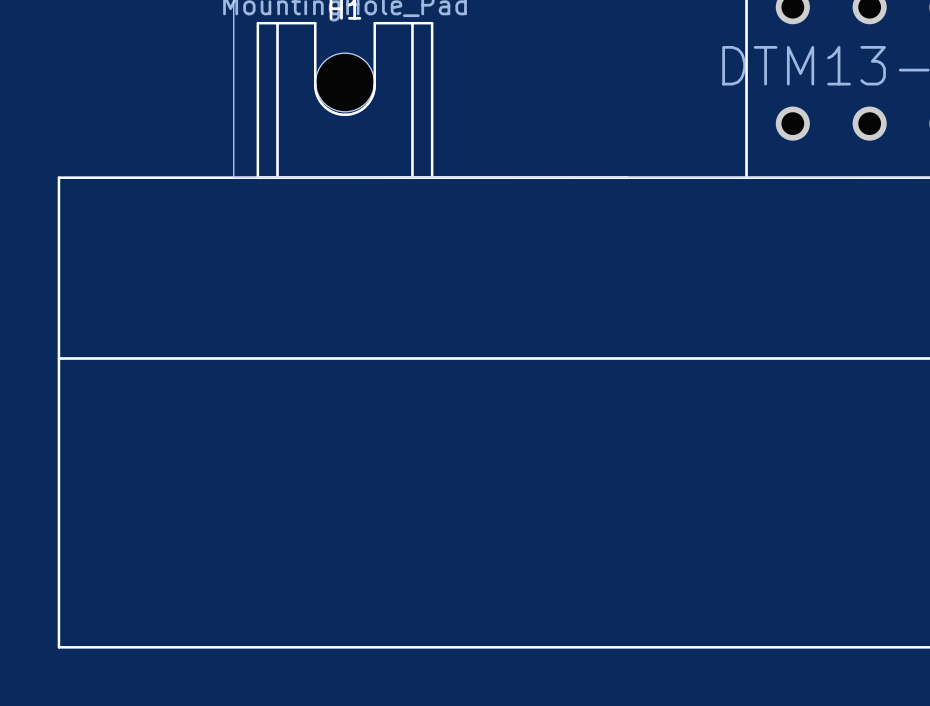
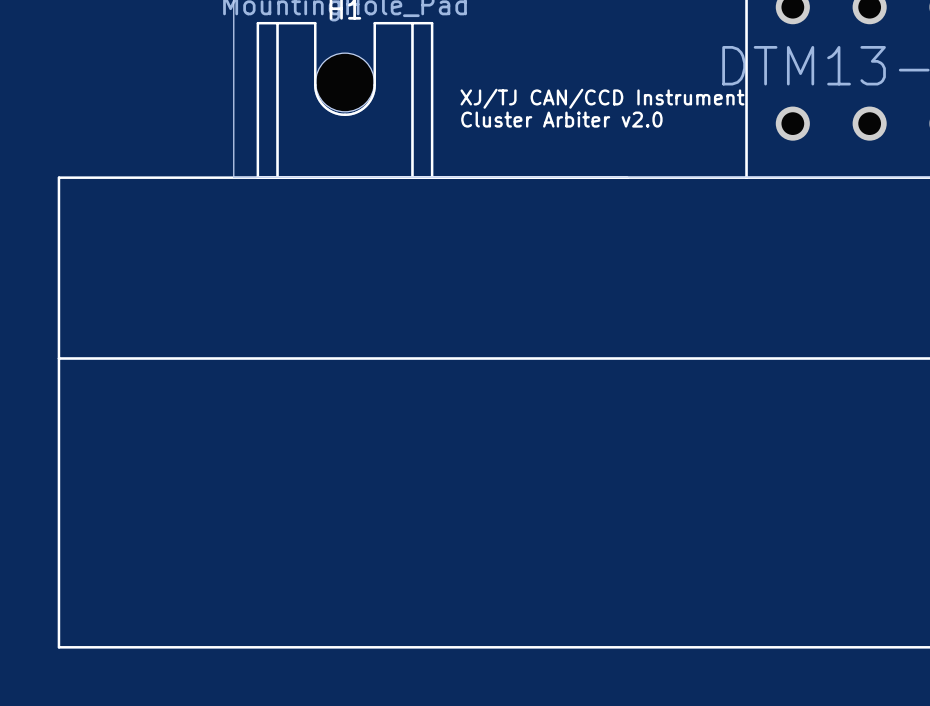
text: none -> XJ/TJ CAN/CCD Instrument (602, 98)
text: none -> Cluster Arbiter v2.0 (561, 119)

